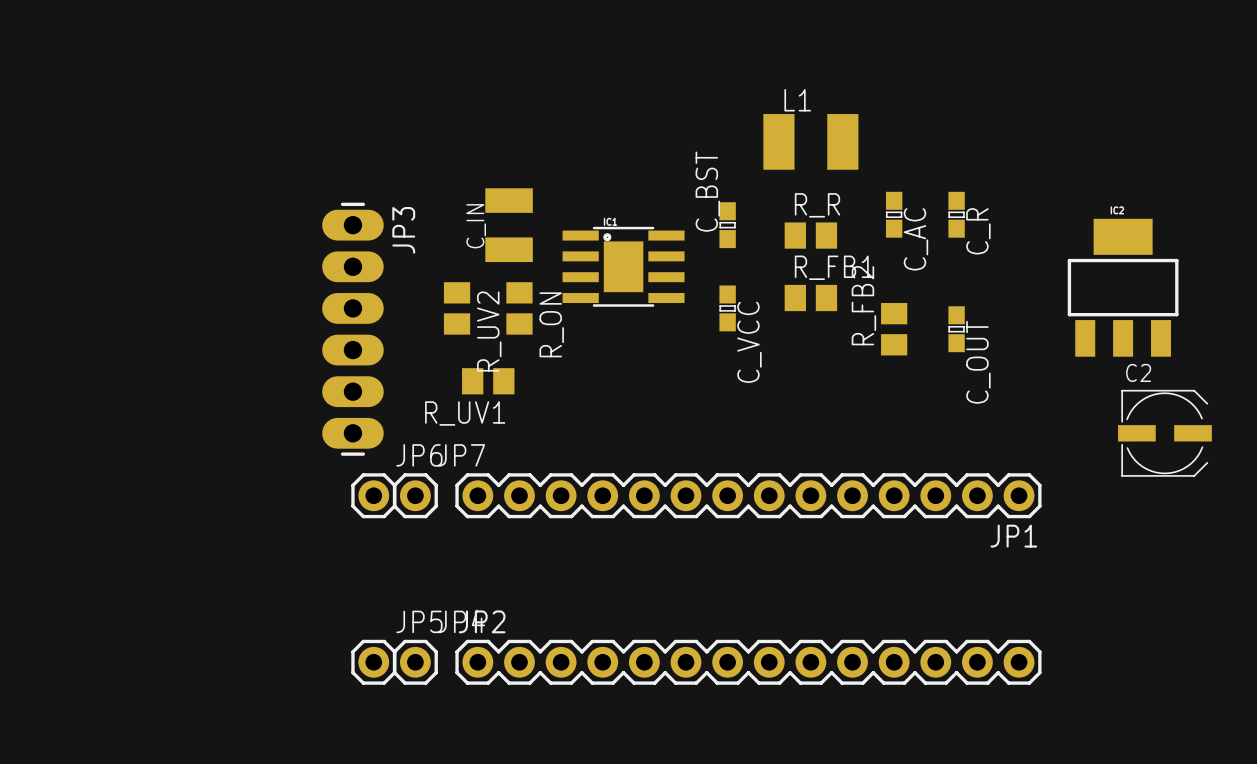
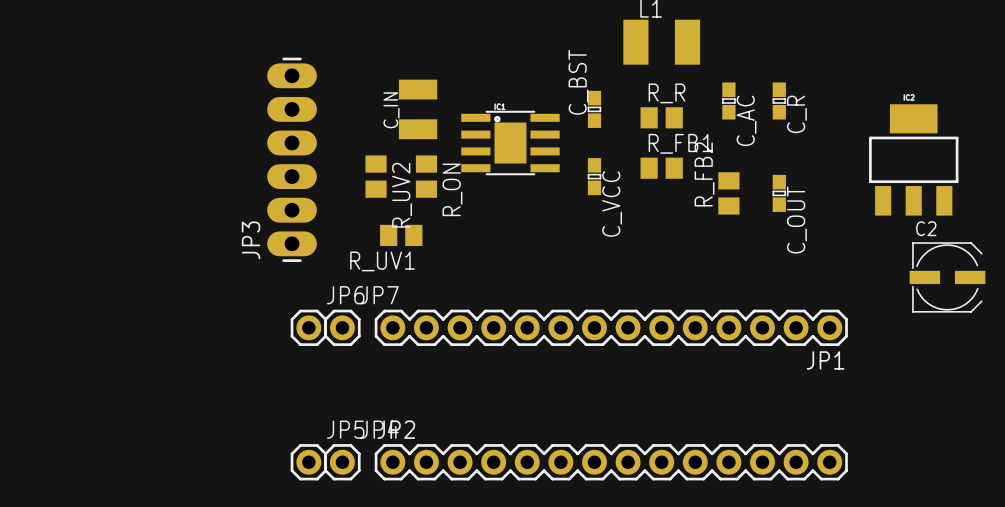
JP3 name position: JP3 (403, 230) -> JP3 (251, 240)
JP3 position: (352, 329) -> (292, 159)

